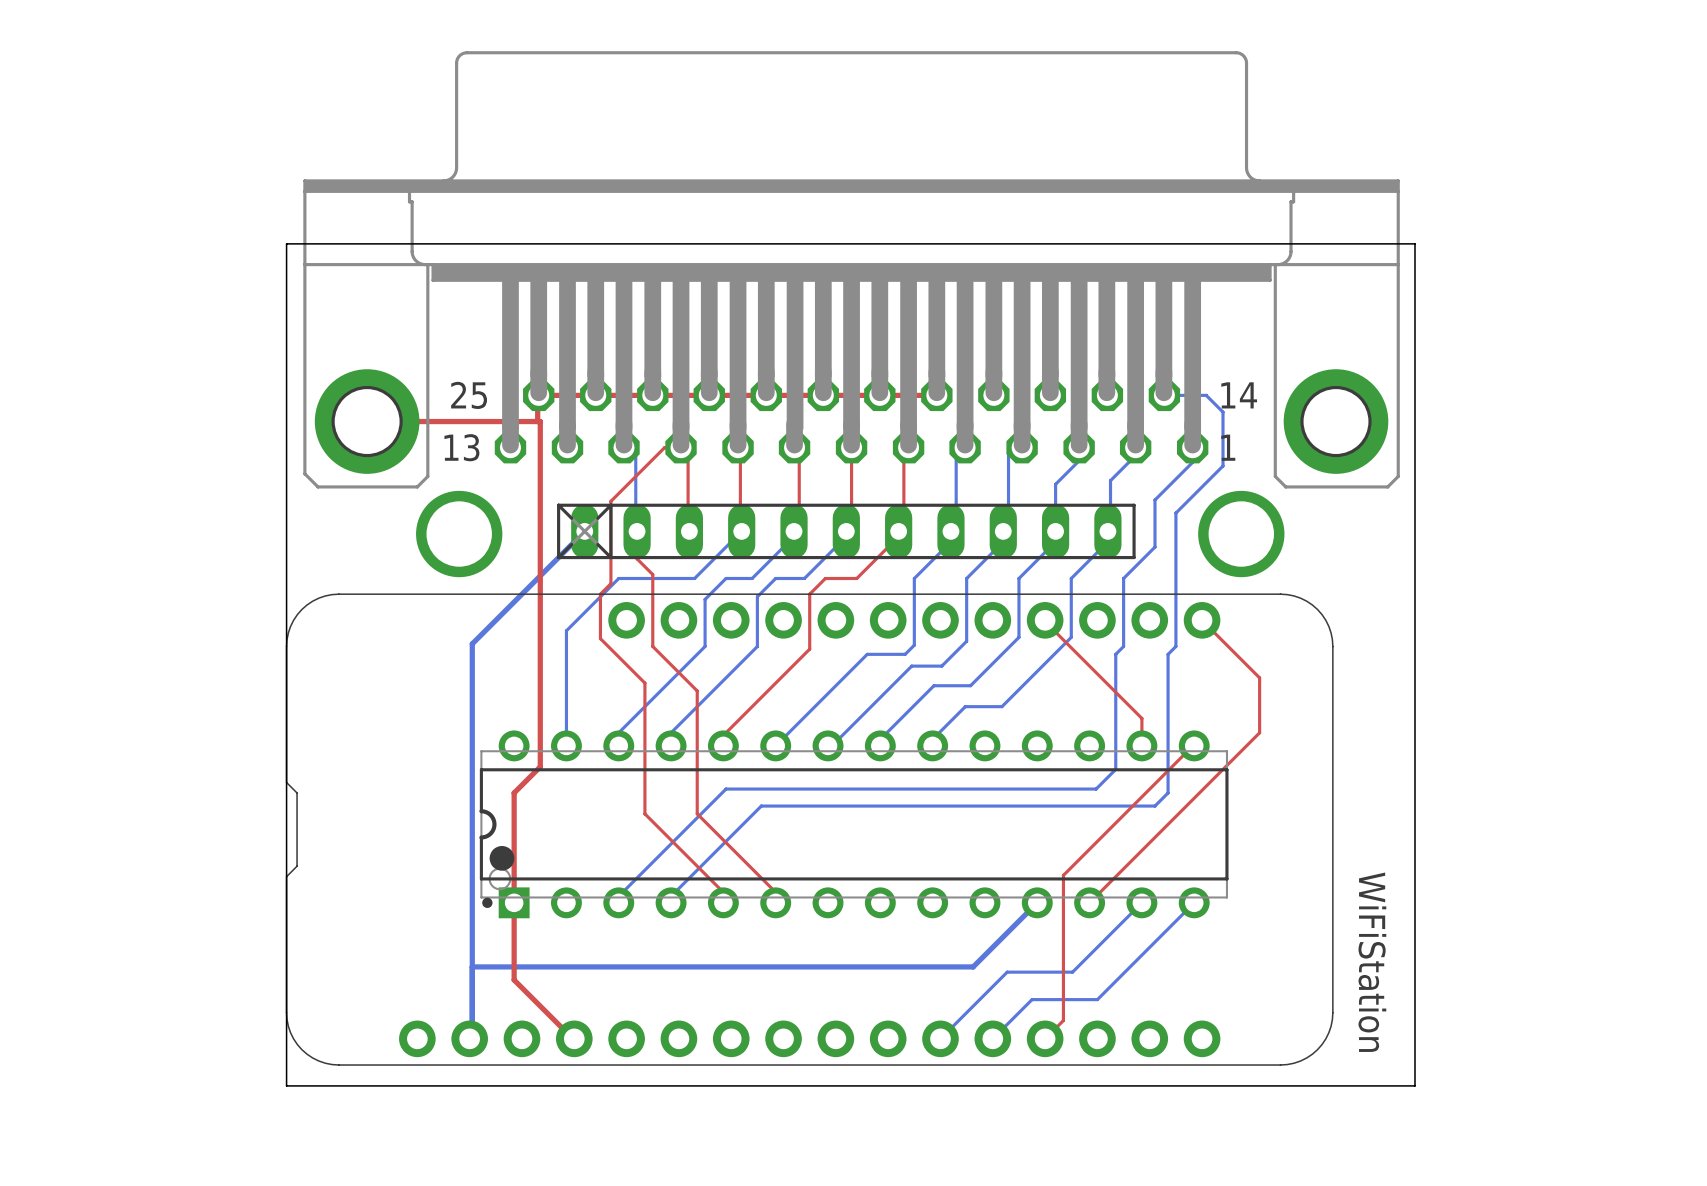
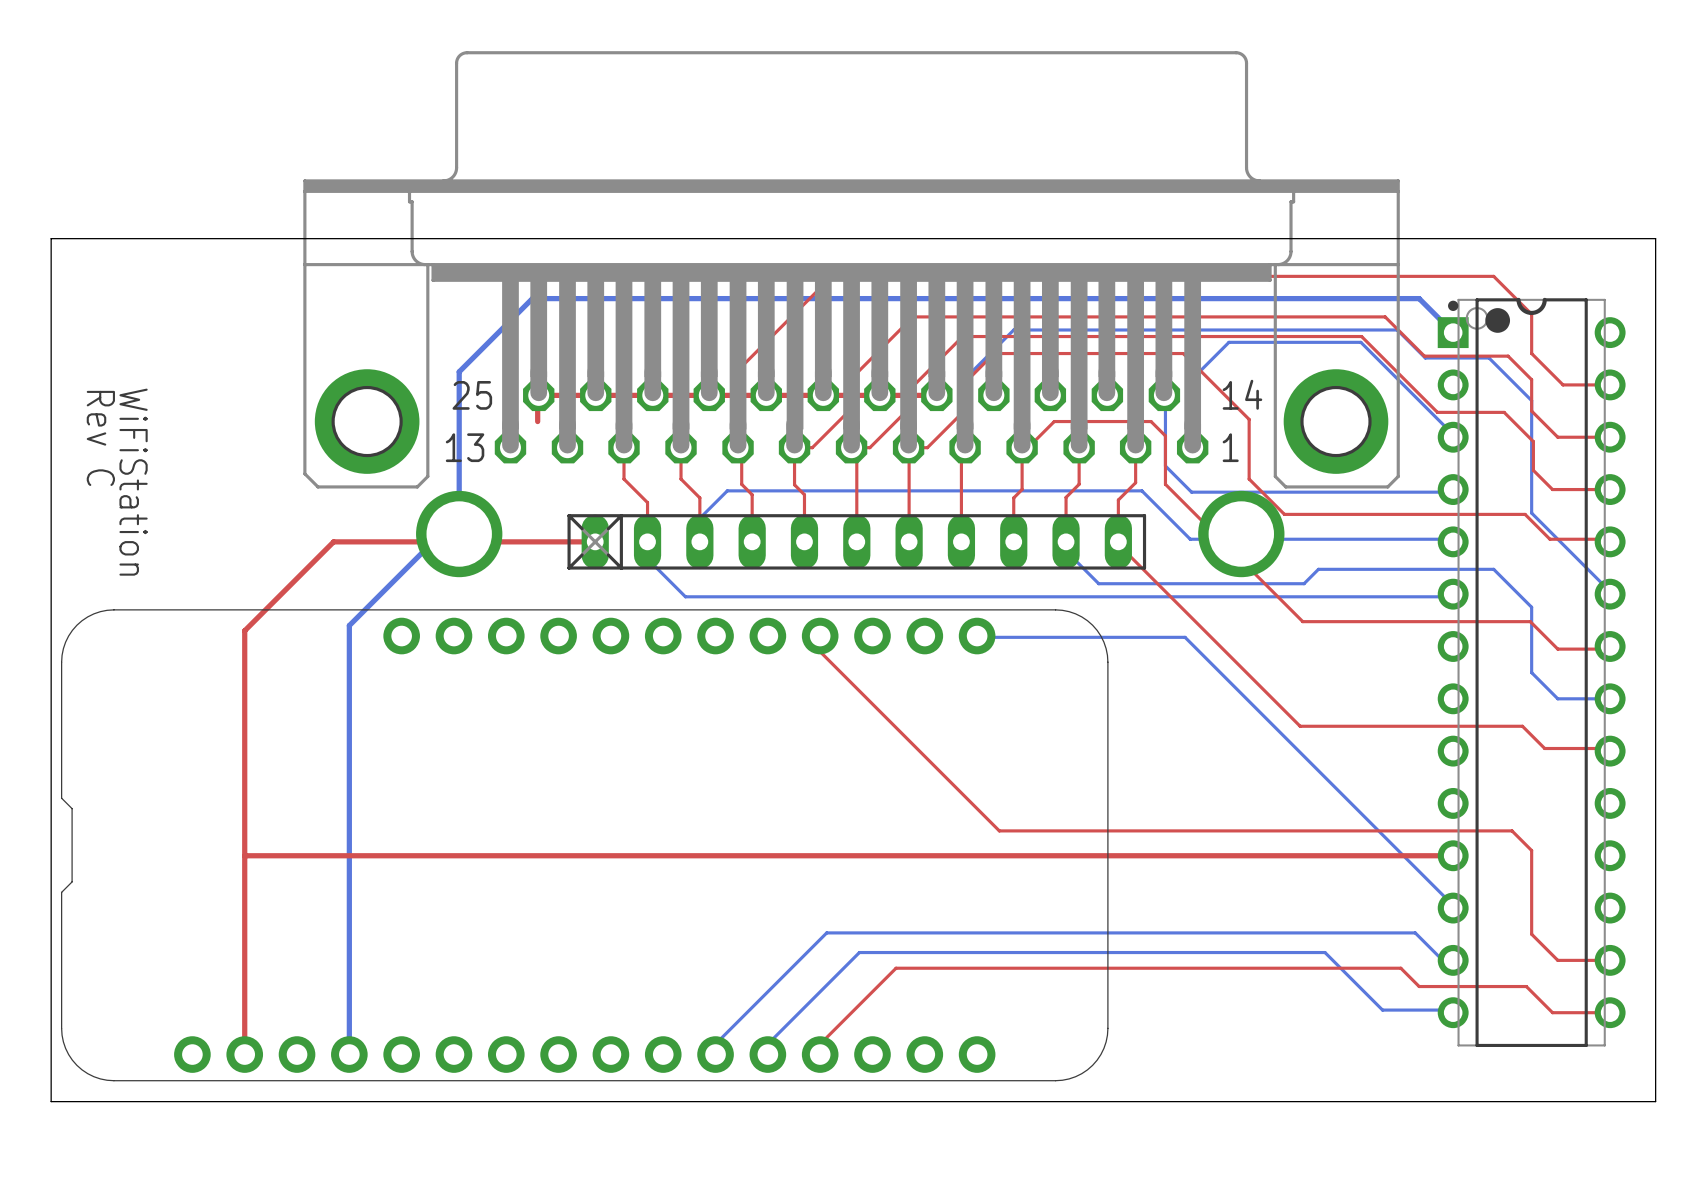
board edge: (286, 243) (1414, 243) (1414, 1085) (286, 1085) (286, 243) -> (51, 238) (51, 1101) (1655, 1101) (1655, 238) (51, 238)
bottom track: none -> (1453, 332) (1419, 298) (532, 298) (459, 371) (459, 515) (349, 625) (349, 1054)
top track: none -> (1610, 384) (1563, 384) (1531, 353) (1531, 314) (1493, 276) (831, 276) (739, 369) (738, 447) (741, 451) (741, 484) (752, 494) (752, 541)
bottom track: (1165, 395) (1206, 395) (1222, 412) (1222, 466) (1175, 513) (1175, 646) (1168, 654) (1168, 792) (1154, 806) (761, 806) (671, 896) (671, 902) -> none
bottom track: none -> (1165, 396) (1165, 466) (1191, 492) (1450, 492) (1453, 489)
top track: (367, 421) (540, 421) (540, 766) (514, 792) (514, 980) (574, 1038) -> none
text: none -> Rev C (100, 438)
top track: none -> (624, 447) (624, 479) (647, 502) (647, 541)
bottom track: (624, 447) (635, 447) (635, 526) (637, 531) (639, 528) -> none
top track: none -> (681, 447) (681, 479) (699, 497) (699, 541)
top track: (738, 447) (740, 447) (741, 531) -> none
top track: none -> (794, 447) (794, 484) (804, 494) (804, 541)
top track: (799, 447) (799, 526) (794, 531) -> (799, 447) (812, 447) (850, 409) (850, 379) (913, 316) (1385, 316) (1424, 356) (1508, 356) (1531, 379) (1531, 411) (1557, 437) (1610, 437)
top track: (851, 447) (851, 526) (846, 531) -> none
top track: (908, 447) (903, 447) (903, 526) (898, 531) (898, 536) (856, 578) (825, 578) (809, 594) (809, 649) (723, 735) (723, 745) -> none
top track: none -> (965, 447) (961, 451) (961, 541)
bottom track: (965, 447) (956, 447) (956, 526) (950, 531) (956, 536) (914, 578) (914, 645) (905, 654) (867, 654) (775, 745) -> none
bottom track: none -> (966, 447) (966, 377) (1013, 329) (1397, 329) (1425, 357) (1489, 357) (1531, 400) (1531, 513) (1610, 591) (1610, 594)
bottom track: (1022, 447) (1008, 447) (1008, 526) (1003, 531) (1003, 541) (966, 578) (966, 641) (941, 666) (911, 666) (831, 745) (828, 745) -> none
top track: none -> (1079, 447) (1079, 484) (1066, 497) (1066, 541)
bottom track: (1079, 447) (1079, 460) (1055, 484) (1055, 541) (1018, 578) (1018, 637) (970, 685) (933, 685) (880, 739) (880, 745) -> none
top track: none -> (1135, 447) (1135, 482) (1118, 500) (1119, 545) (1300, 726) (1522, 726) (1544, 748) (1610, 748) (1610, 751)
bottom track: (1135, 447) (1135, 455) (1110, 480) (1110, 528) (1107, 531) (1107, 541) (1071, 578) (1071, 637) (1001, 706) (965, 706) (932, 739) (932, 745) -> none
bottom track: (1192, 447) (1192, 462) (1154, 500) (1154, 547) (1123, 578) (1123, 646) (1115, 654) (1115, 769) (1096, 789) (726, 789) (618, 896) (618, 902) -> (1192, 447) (1194, 447) (1191, 444) (1191, 379) (1228, 342) (1360, 342) (1453, 434) (1453, 437)
text: none -> WiFiStation (133, 482)
top track: none -> (1610, 489) (1552, 489) (1533, 470) (1533, 441) (1504, 412) (1437, 412) (1361, 336) (962, 336) (909, 390) (909, 408) (869, 447) (851, 447) (856, 452) (856, 541)
bottom track: (584, 531) (472, 643) (472, 1040) -> none
top track: (637, 531) (637, 558) (652, 574) (652, 646) (697, 690) (697, 813) (775, 892) (775, 902) -> none
top track: (689, 531) (688, 454) (681, 447) (664, 447) (610, 501) (610, 583) (600, 594) (600, 638) (644, 683) (644, 813) (723, 892) (723, 902) -> none
bottom track: (741, 531) (694, 578) (618, 578) (566, 630) (566, 745) -> none
bottom track: (794, 531) (794, 536) (752, 578) (726, 578) (705, 599) (705, 646) (618, 732) (618, 745) -> none
bottom track: (846, 531) (846, 536) (804, 578) (775, 578) (757, 596) (757, 646) (671, 732) (671, 745) -> none
part position: (846, 531) -> (856, 541)
top track: none -> (595, 541) (333, 541) (244, 630) (244, 1054)
bottom track: none -> (647, 541) (647, 558) (685, 596) (1450, 596) (1453, 594)
bottom track: none -> (699, 541) (699, 518) (727, 490) (1141, 490) (1190, 539) (1453, 539) (1453, 541)
top track: none -> (909, 541) (908, 447) (927, 447) (965, 409) (965, 382) (994, 353) (1183, 353) (1249, 419) (1249, 479) (1284, 514) (1525, 514) (1549, 539) (1610, 539) (1610, 541)
top track: none -> (1013, 541) (1013, 497) (1022, 489) (1022, 447) (1028, 447) (1054, 421) (1151, 421) (1165, 435) (1165, 484) (1302, 621) (1530, 621) (1557, 649) (1607, 649) (1610, 646)
bottom track: none -> (1066, 543) (1066, 551) (1098, 583) (1304, 583) (1318, 569) (1493, 569) (1531, 607) (1531, 672) (1557, 698) (1610, 698)
top track: (1045, 620) (1141, 718) (1141, 745) -> none
top track: (1202, 620) (1259, 677) (1259, 732) (1089, 902) -> none
top track: none -> (820, 636) (820, 651) (999, 830) (1512, 830) (1531, 850) (1531, 934) (1557, 960) (1610, 960)
bottom track: none -> (977, 636) (1185, 637) (1453, 905) (1453, 908)
part: none -> (1531, 672)
top track: (1194, 745) (1063, 875) (1063, 1020) (1045, 1038) -> none
part: (853, 824) -> none
part position: (809, 829) -> (584, 845)
top track: none -> (244, 855) (1453, 855)
bottom track: (1037, 902) (973, 966) (472, 966) -> none
bottom track: (1141, 902) (1072, 972) (1007, 972) (940, 1038) (941, 1033) -> none
bottom track: (1194, 902) (1097, 999) (1032, 999) (992, 1038) -> none
bottom track: none -> (1453, 960) (1442, 960) (1415, 932) (826, 932) (715, 1044) (715, 1054) (716, 1049)
text: WiFiStation (1372, 962) -> none
bottom track: none -> (1453, 1012) (1453, 1010) (1382, 1010) (1325, 952) (859, 952) (767, 1044)
top track: none -> (1610, 1012) (1552, 1012) (1526, 986) (1419, 986) (1400, 968) (896, 968) (820, 1044) (820, 1054)

